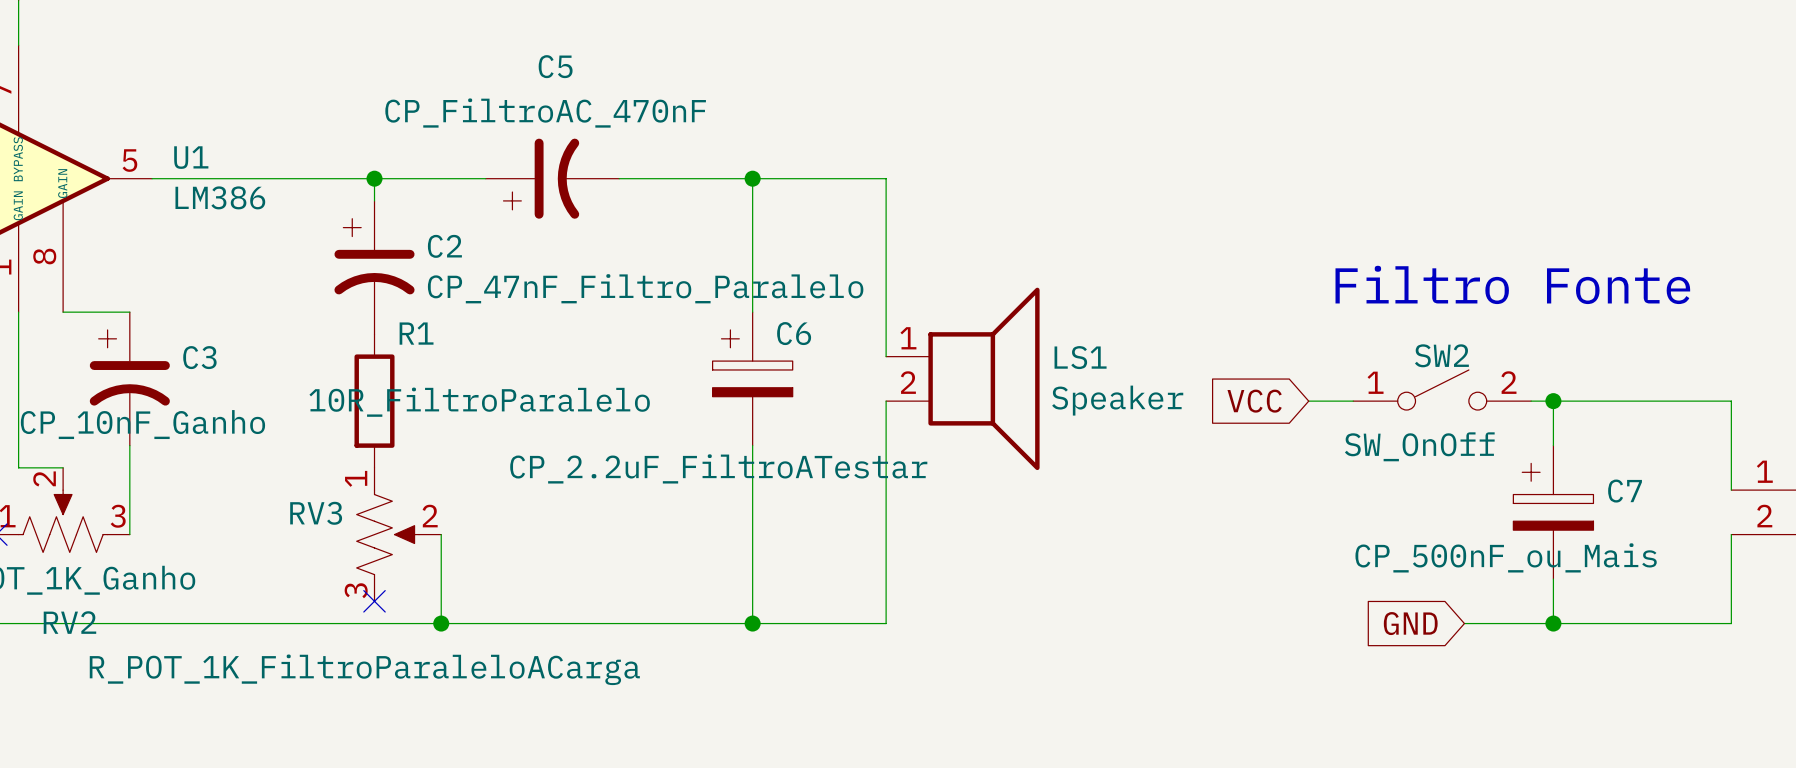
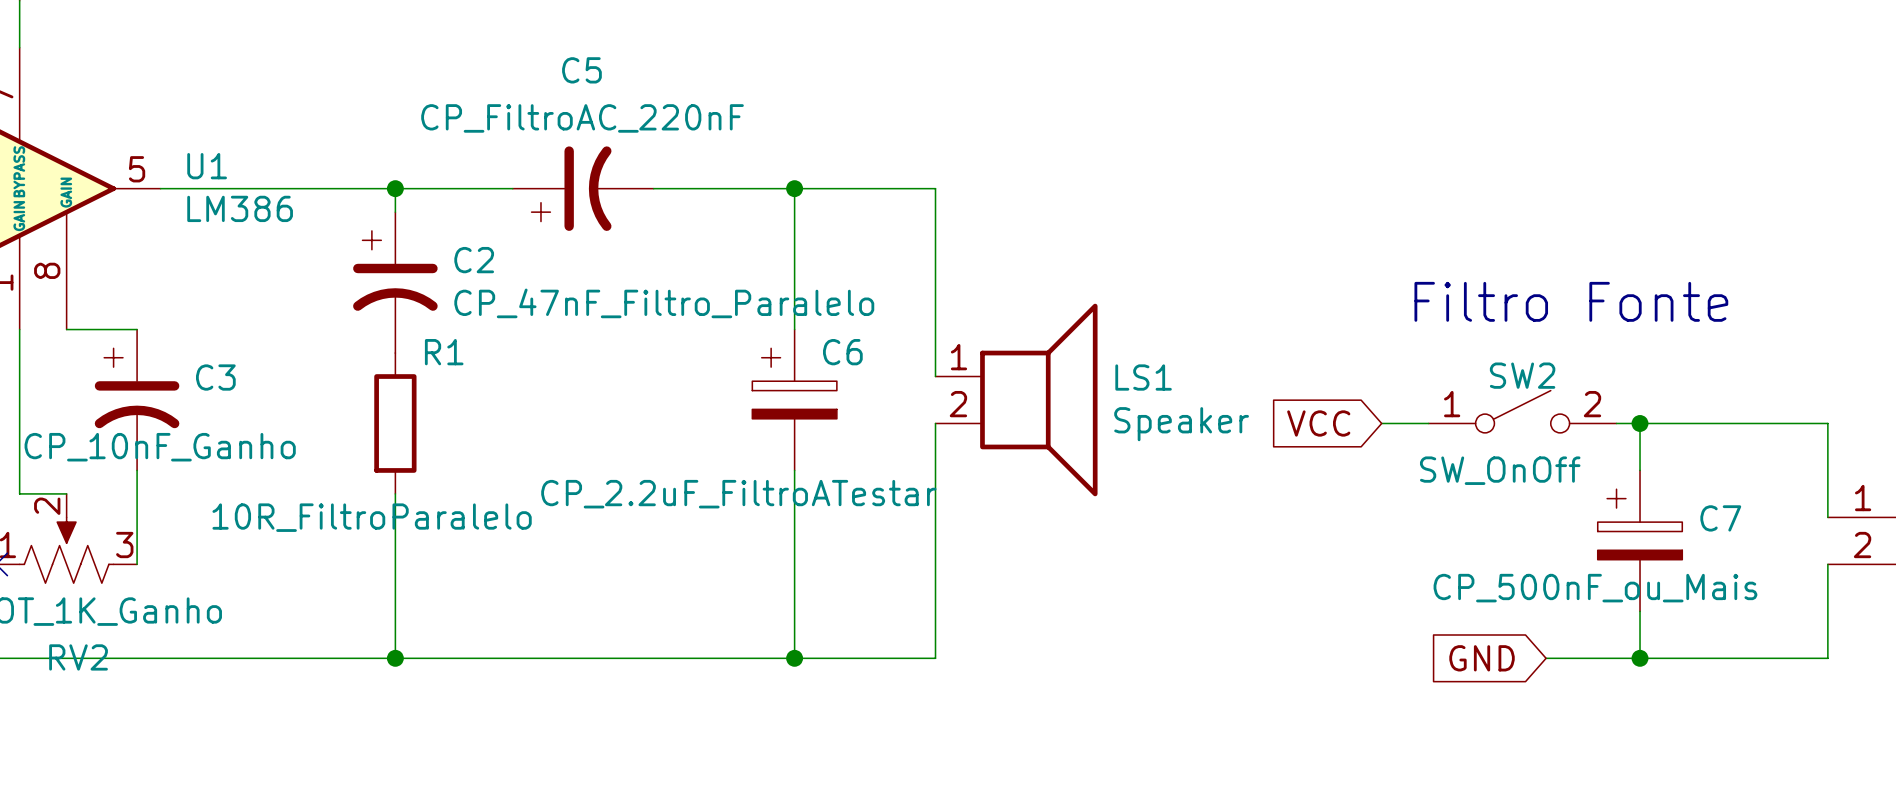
C5 value: CP_FiltroAC_470nF (545, 113) -> CP_FiltroAC_220nF (582, 118)
R1 value position: 10R_FiltroParalelo (479, 402) -> 10R_FiltroParalelo (372, 517)
wire: none -> (395, 493) (395, 658)
RV3: R_POT_1K_FiltroParaleloACarga (398, 534) -> none
wire: (441, 534) (441, 623) -> none
no-connect mark: (374, 601) -> none
junction position: (441, 623) -> (395, 658)

